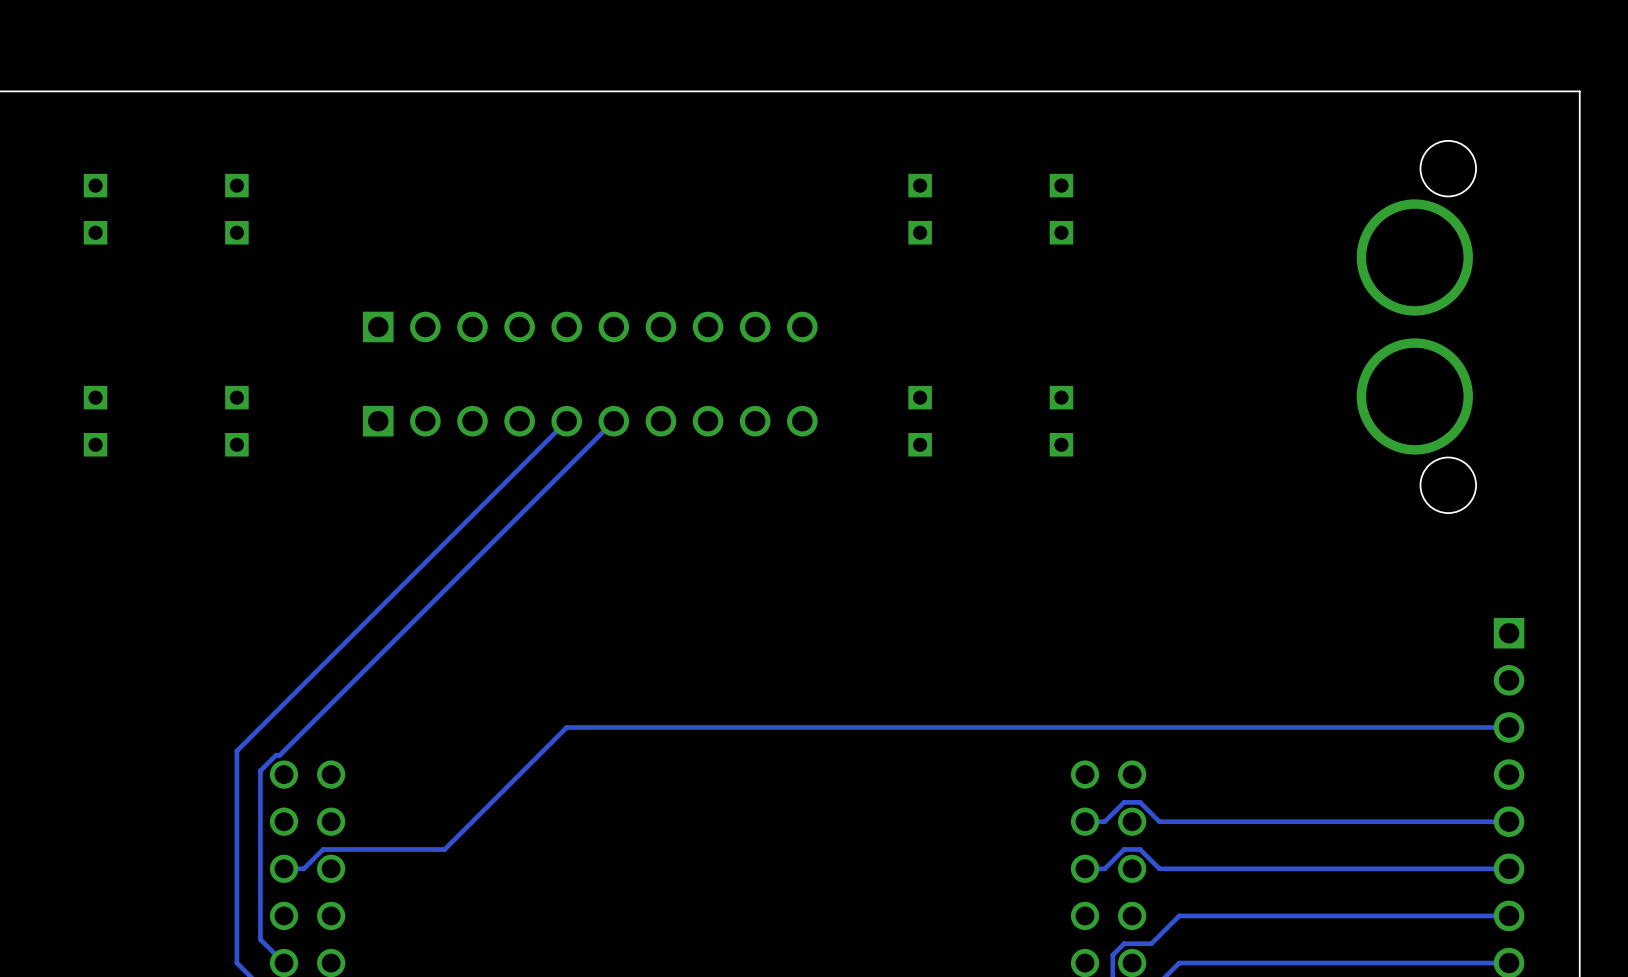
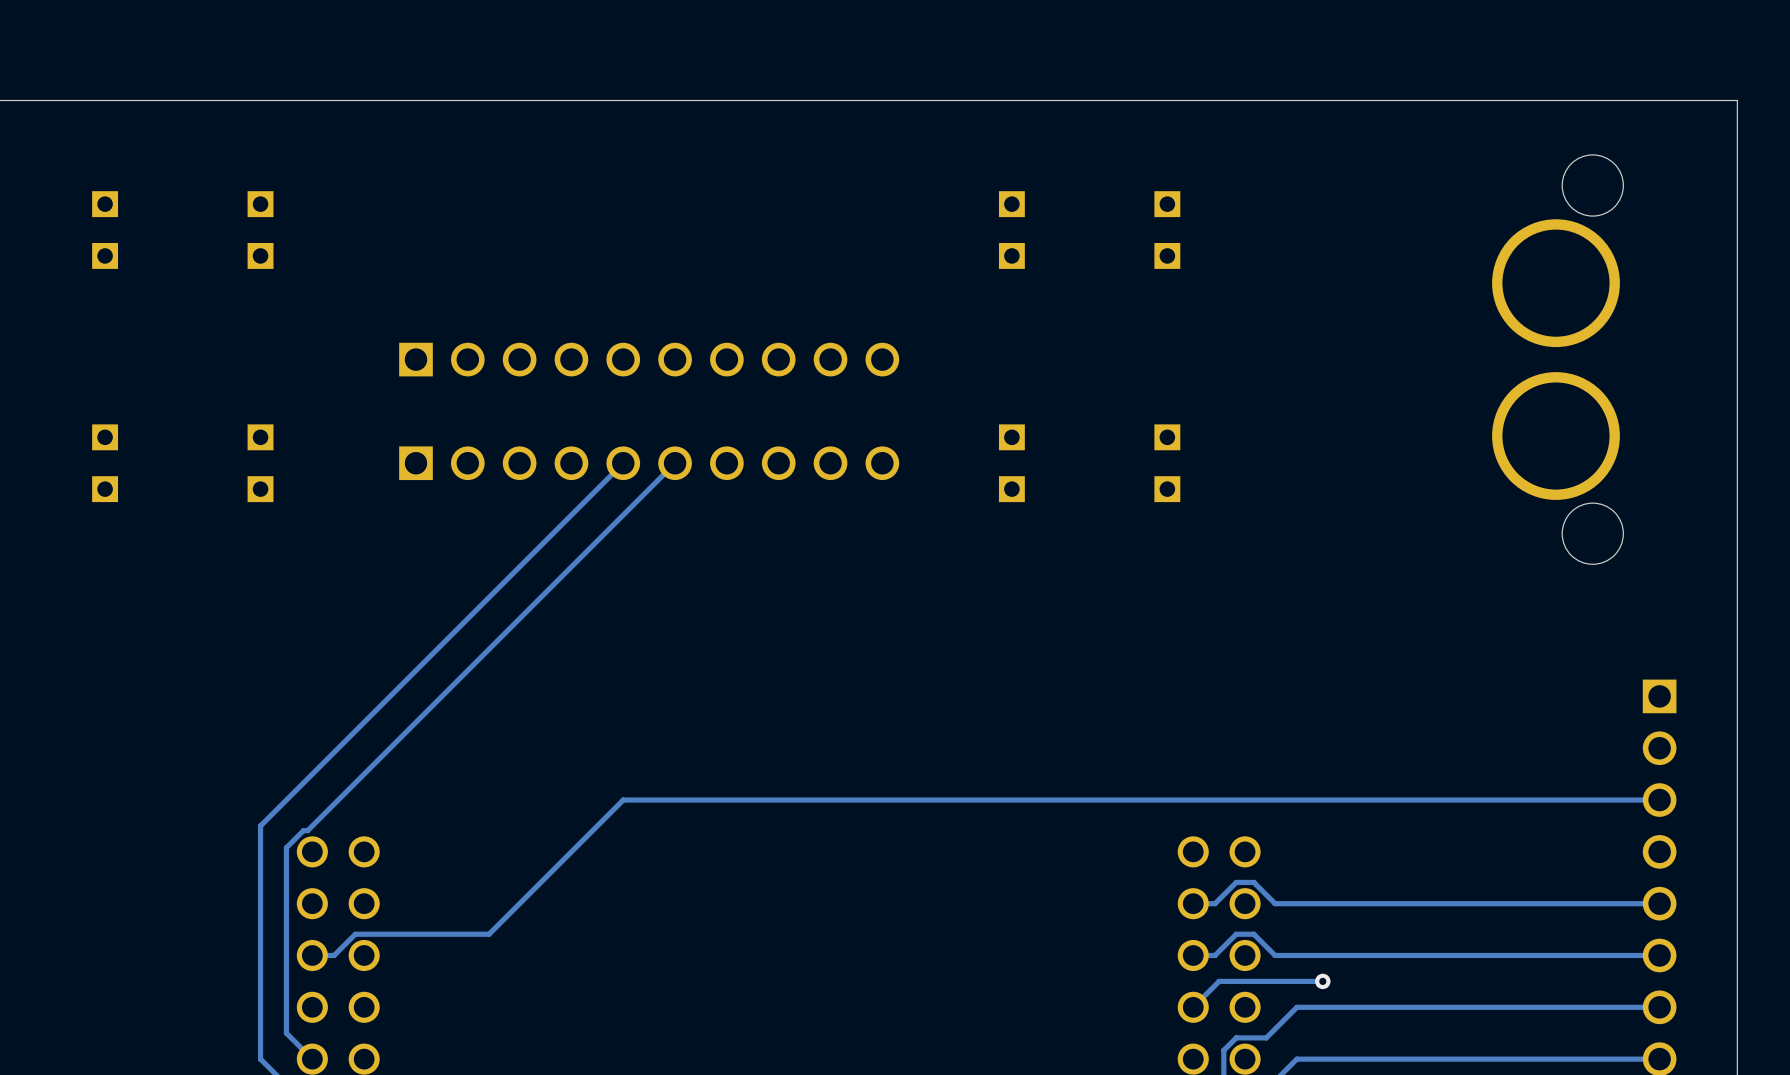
track: none -> (1322, 981) (1219, 981) (1193, 1007)
via: none -> (1322, 981)

